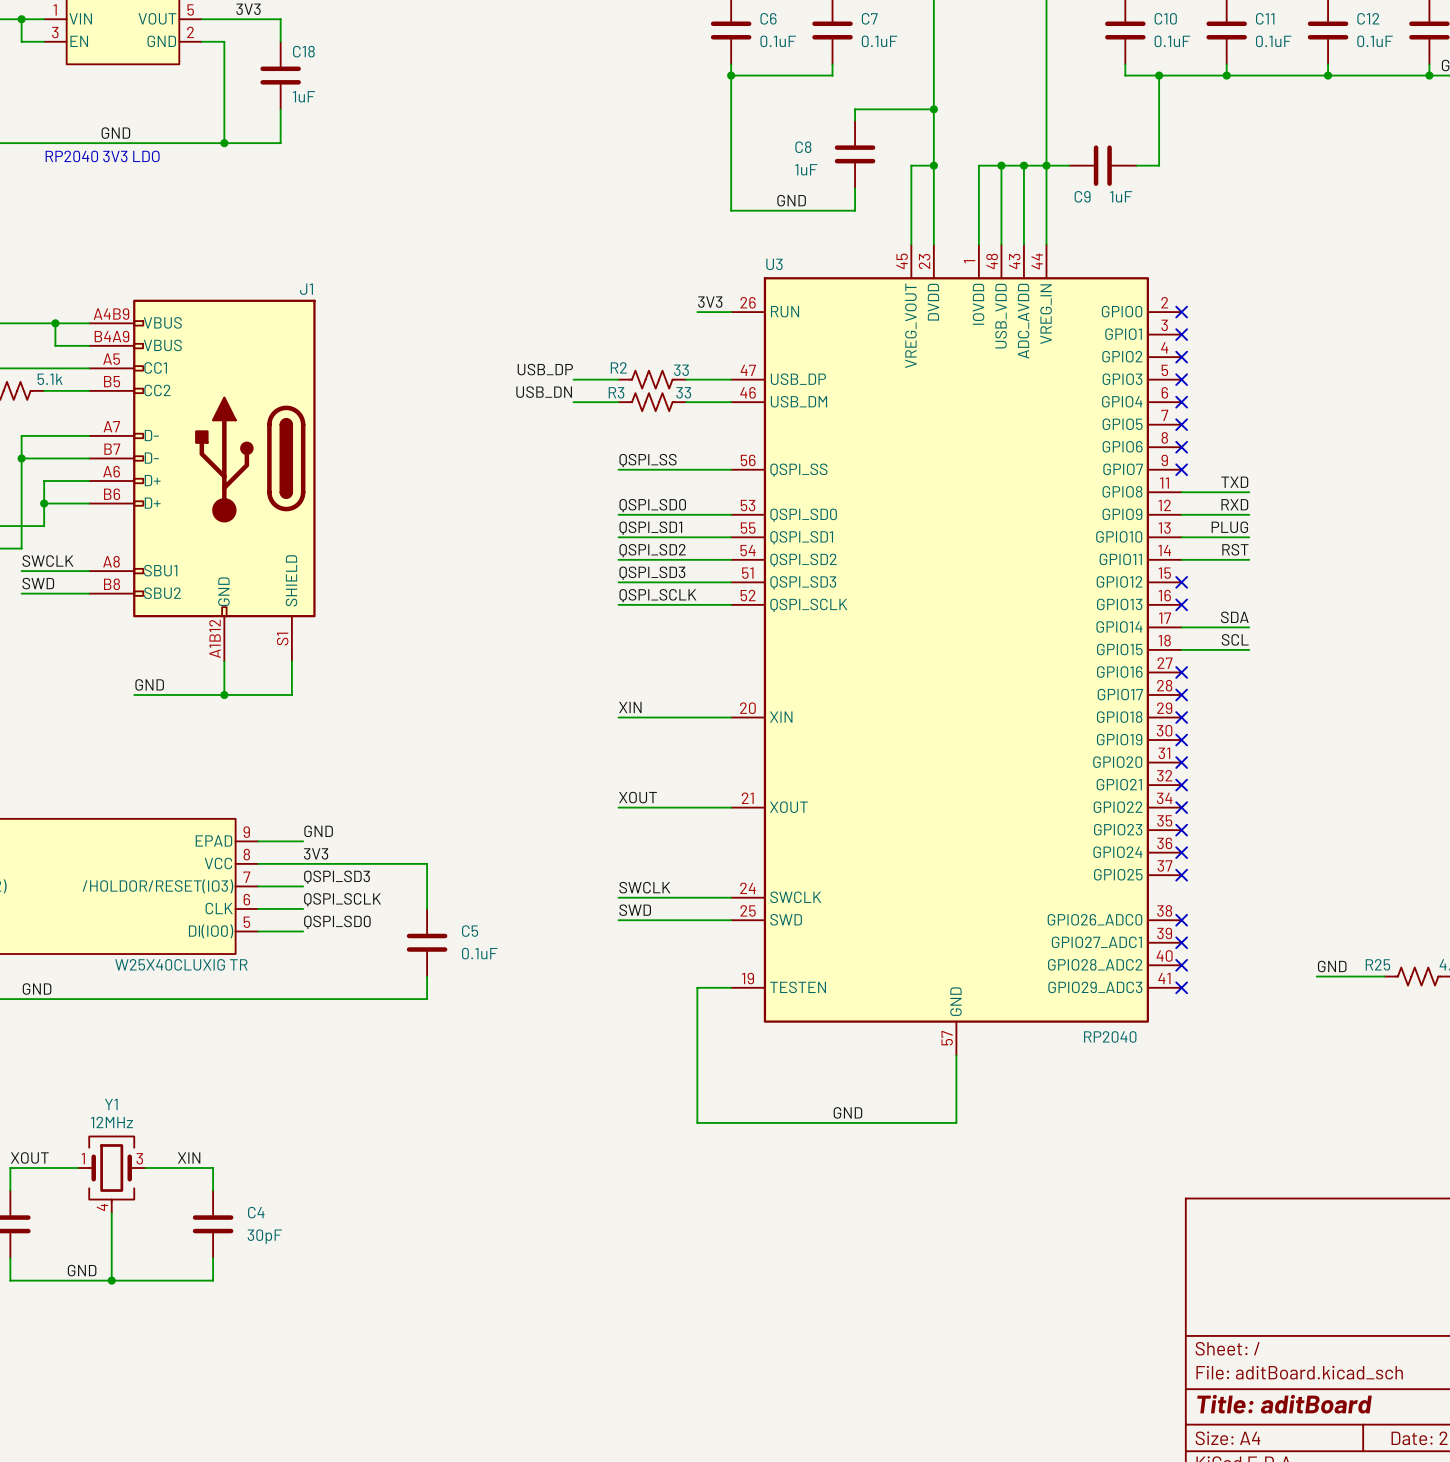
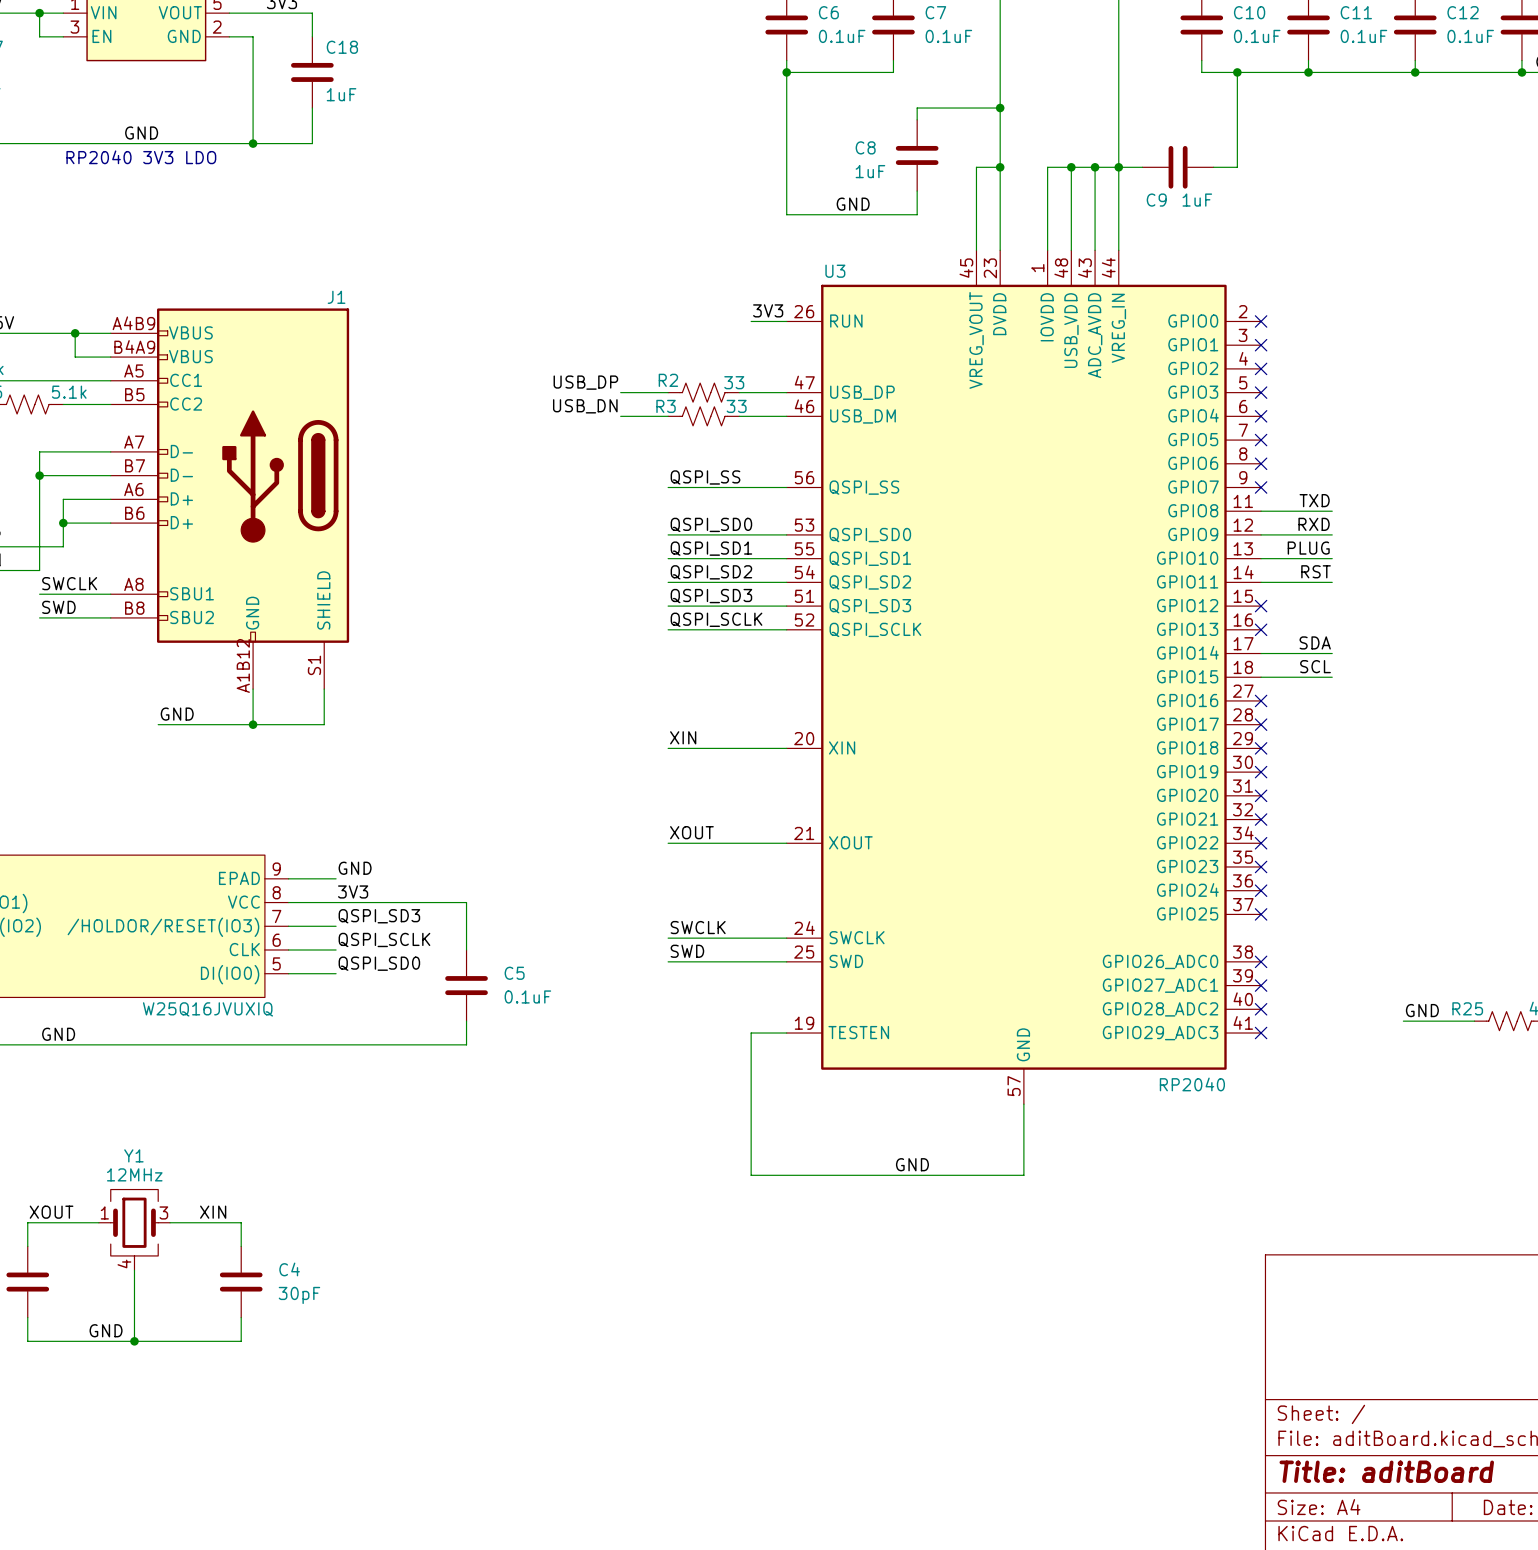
part value: W25X40CLUXIG TR (181, 964) -> W25Q16JVUXIQ (208, 1009)

